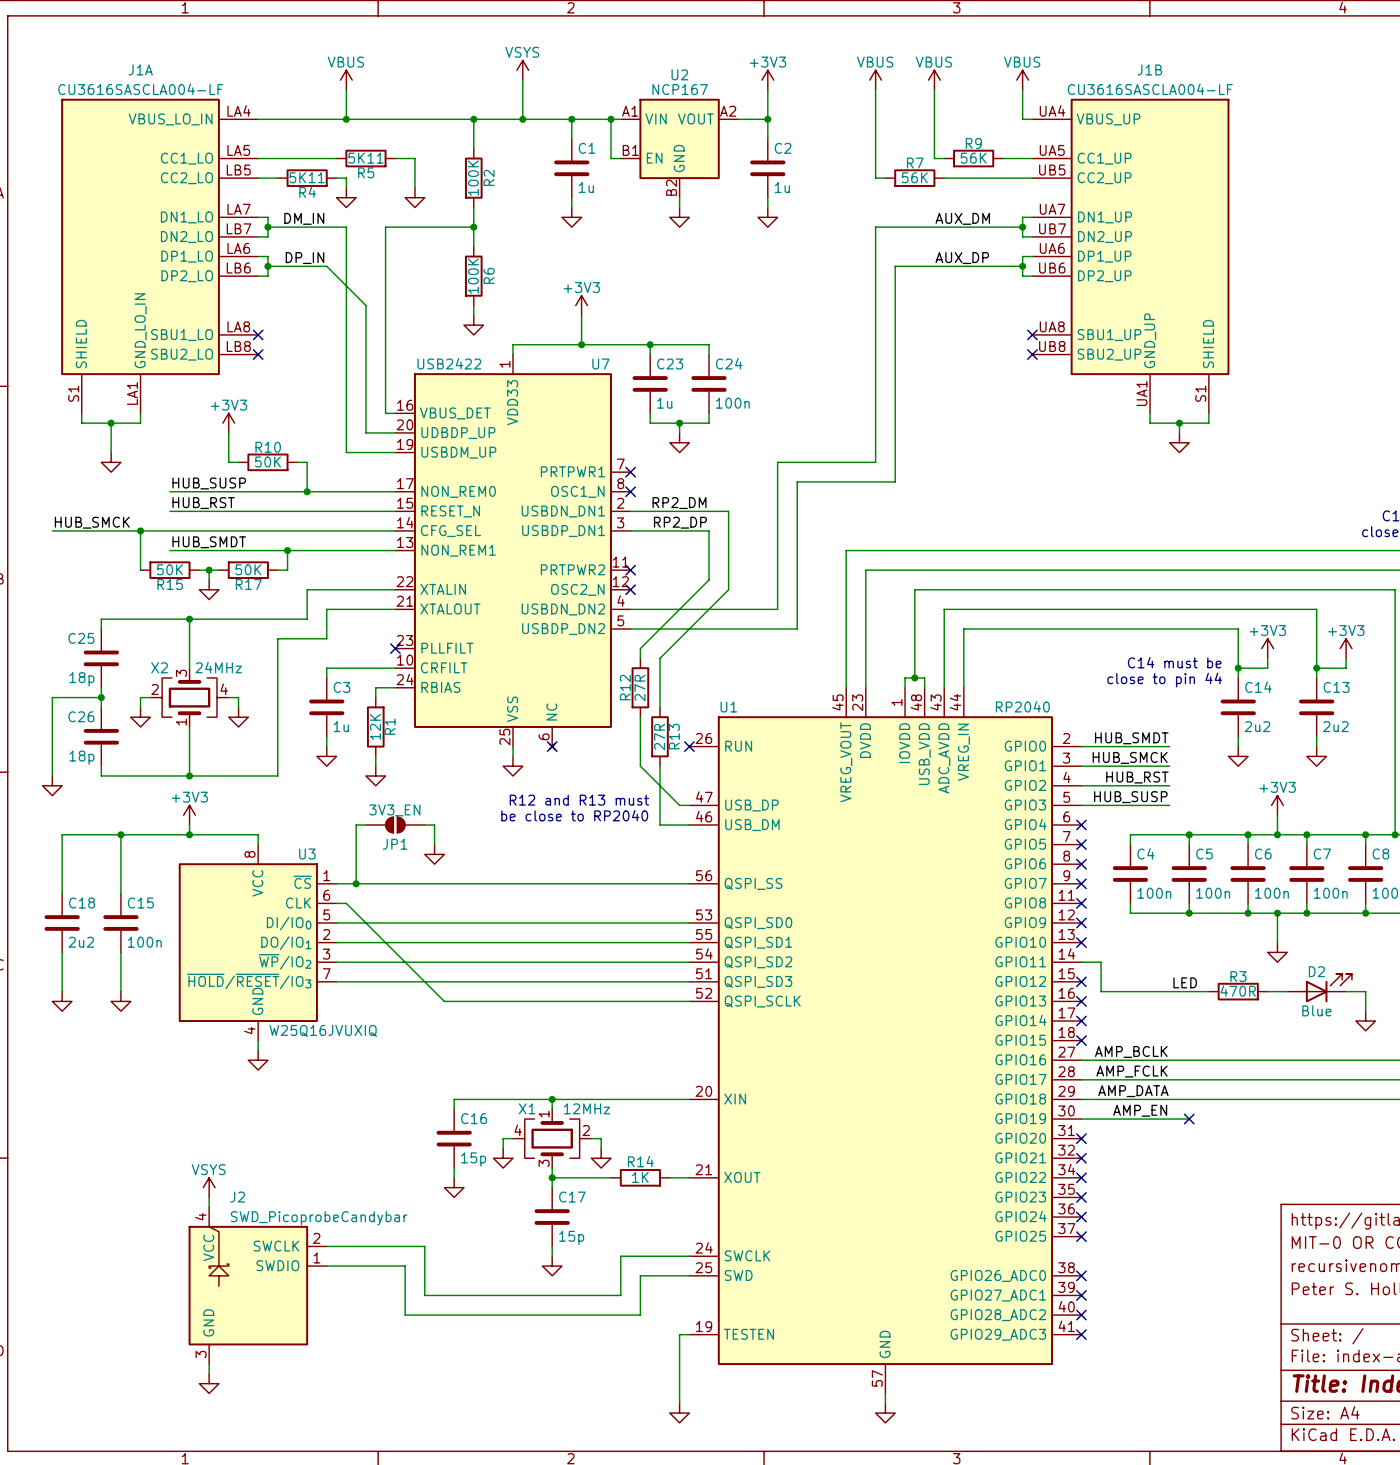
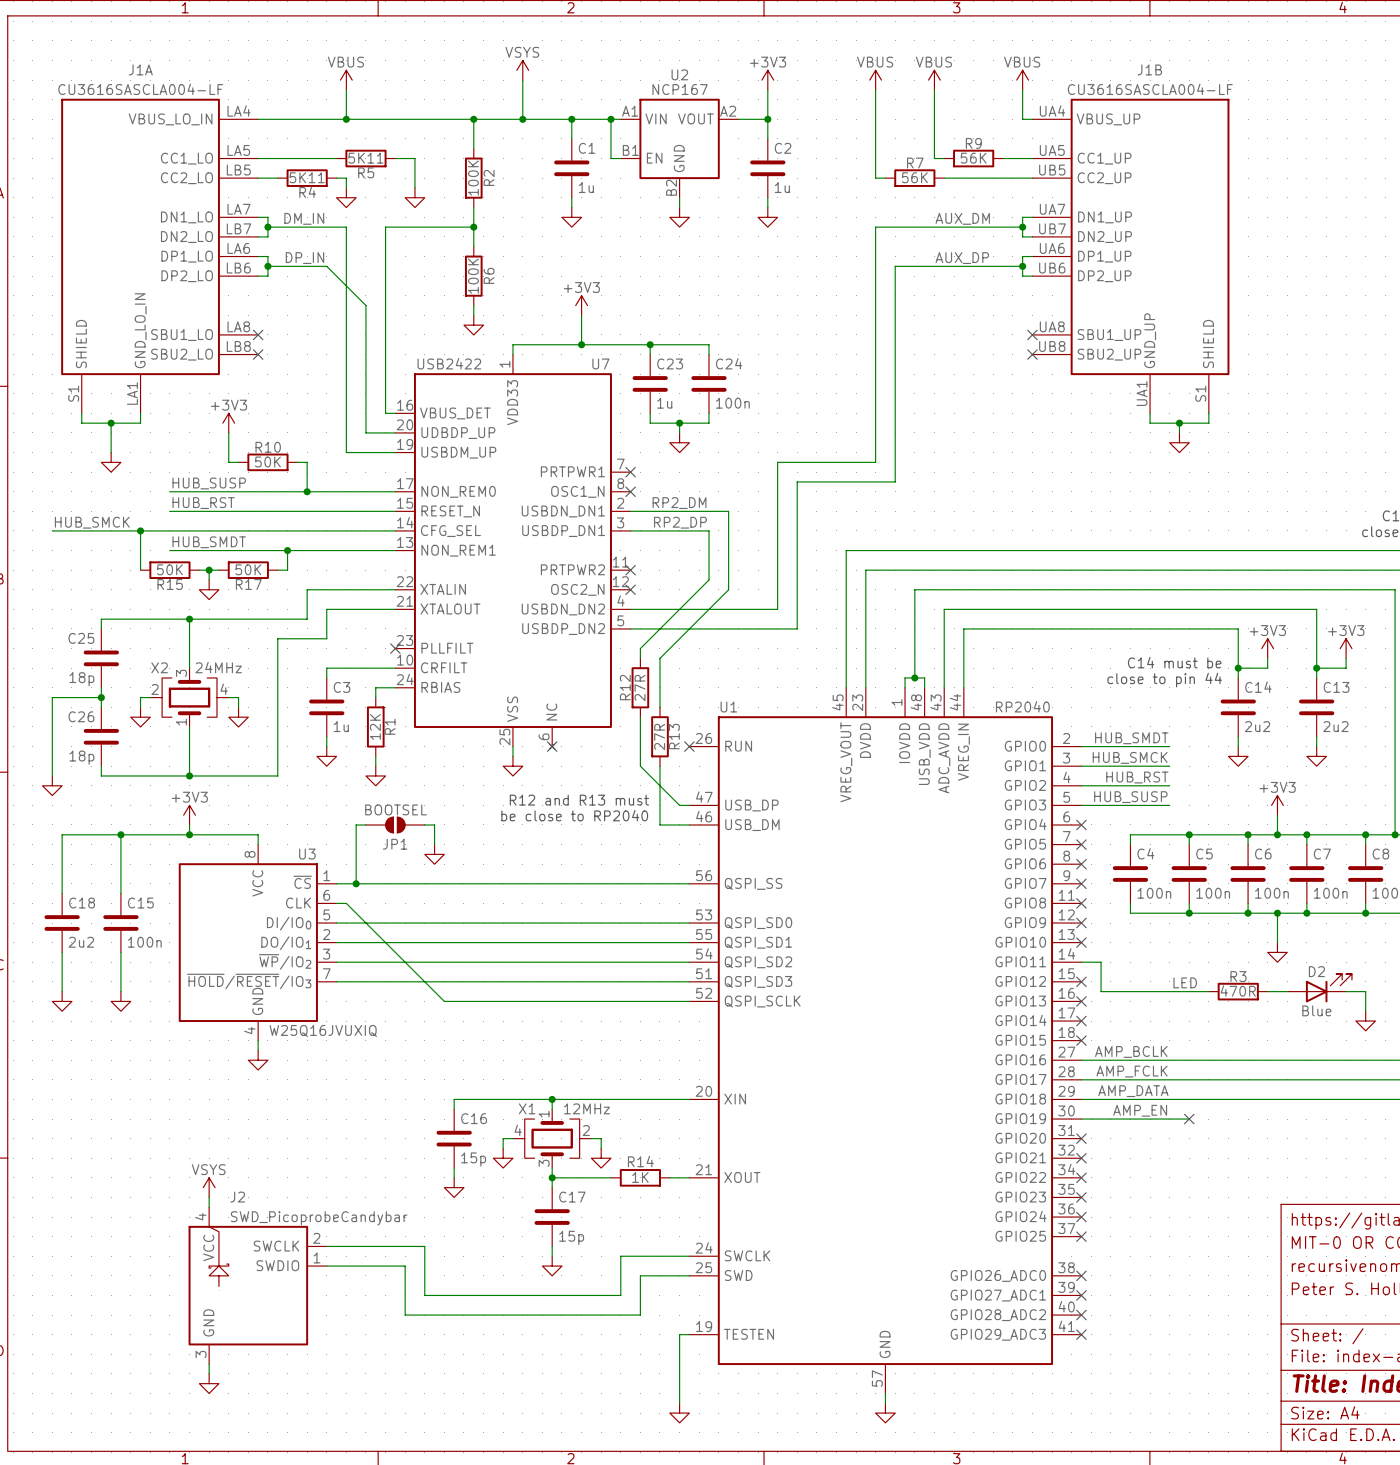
JP1 value: 3V3_EN (394, 810) -> BOOTSEL (396, 809)

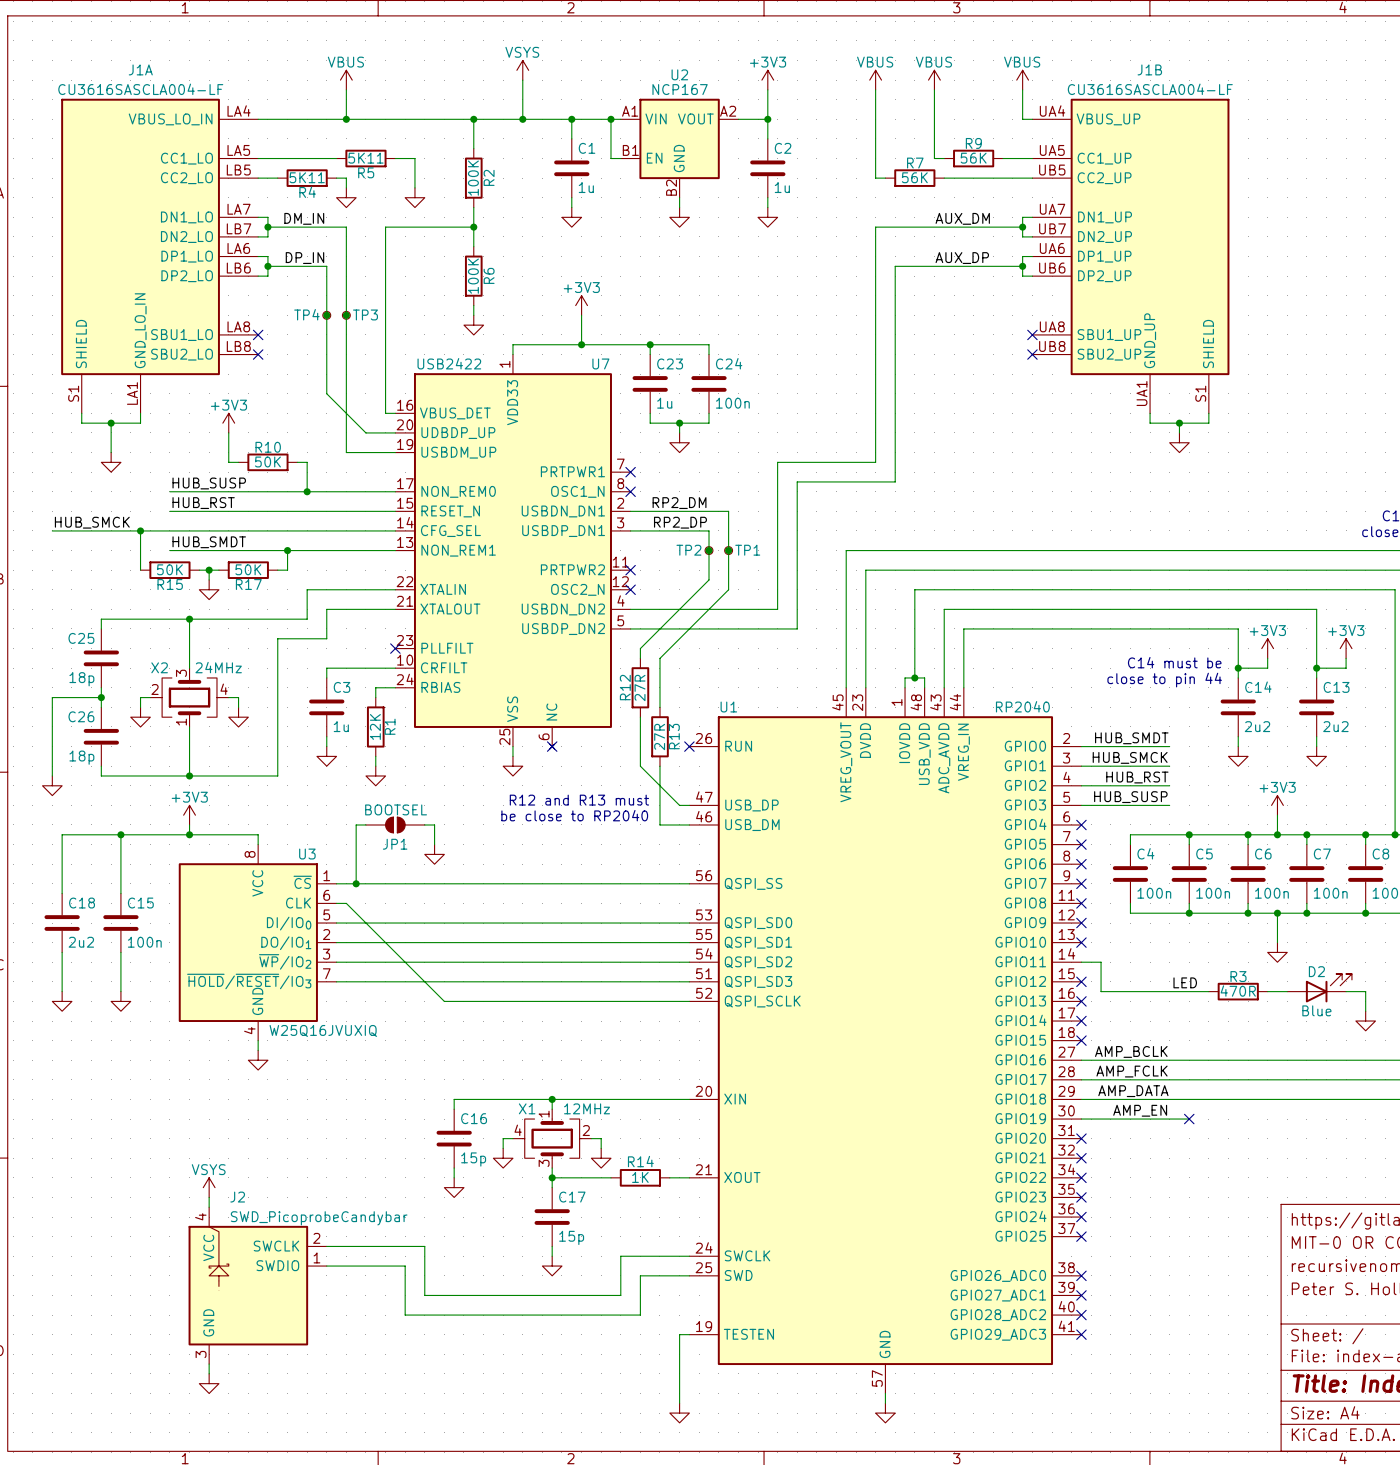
wire: (326, 266) (365, 305) (365, 432) -> (326, 266) (326, 393) (365, 432)
junction: none -> (326, 315)
TP4: none -> (326, 315)
junction: none -> (346, 315)
TP3: none -> (346, 315)
junction: none -> (709, 550)
TP2: none -> (709, 550)
junction: none -> (728, 550)
TP1: none -> (728, 550)

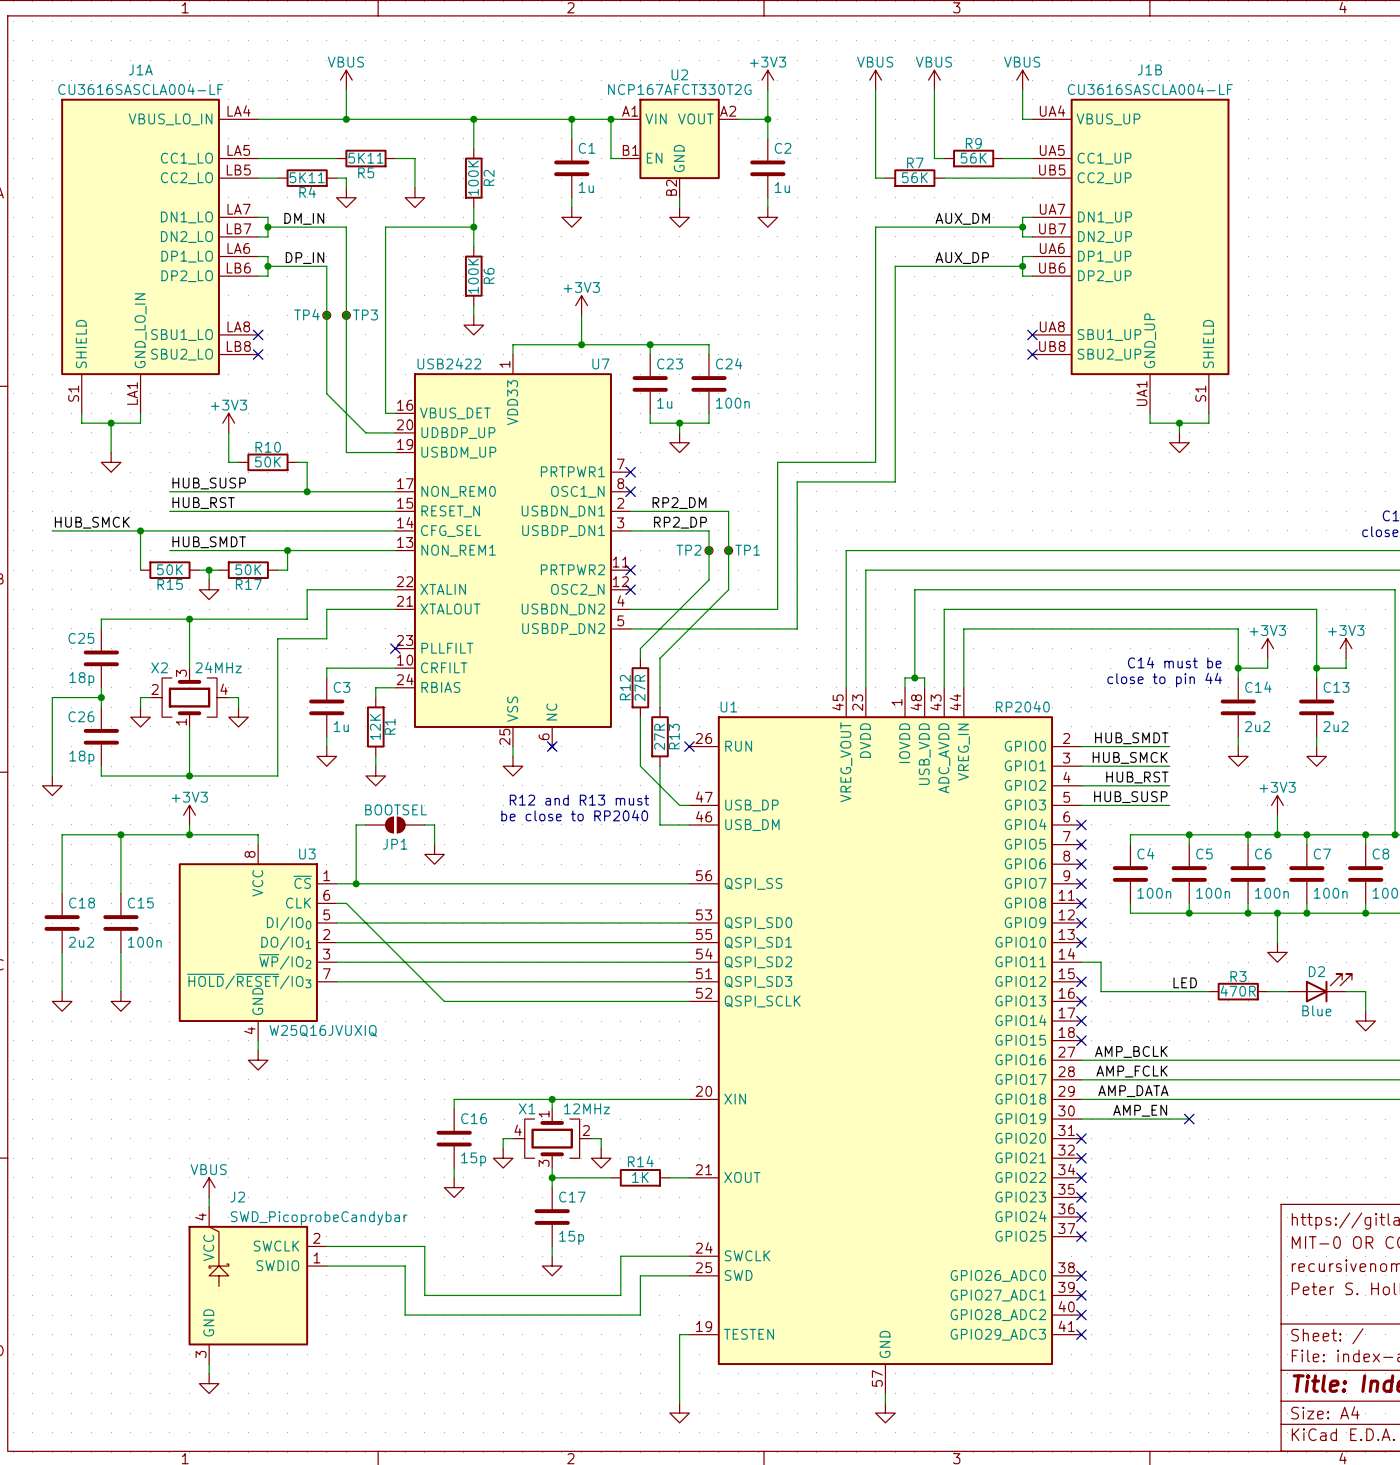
power symbol: VSYS (522, 70) -> none
wire: (522, 80) (522, 119) -> none
U2 value: NCP167 (680, 89) -> NCP167AFCT330T2G (679, 89)
junction: (522, 119) -> none
power symbol: VSYS (209, 1187) -> VBUS (209, 1187)

